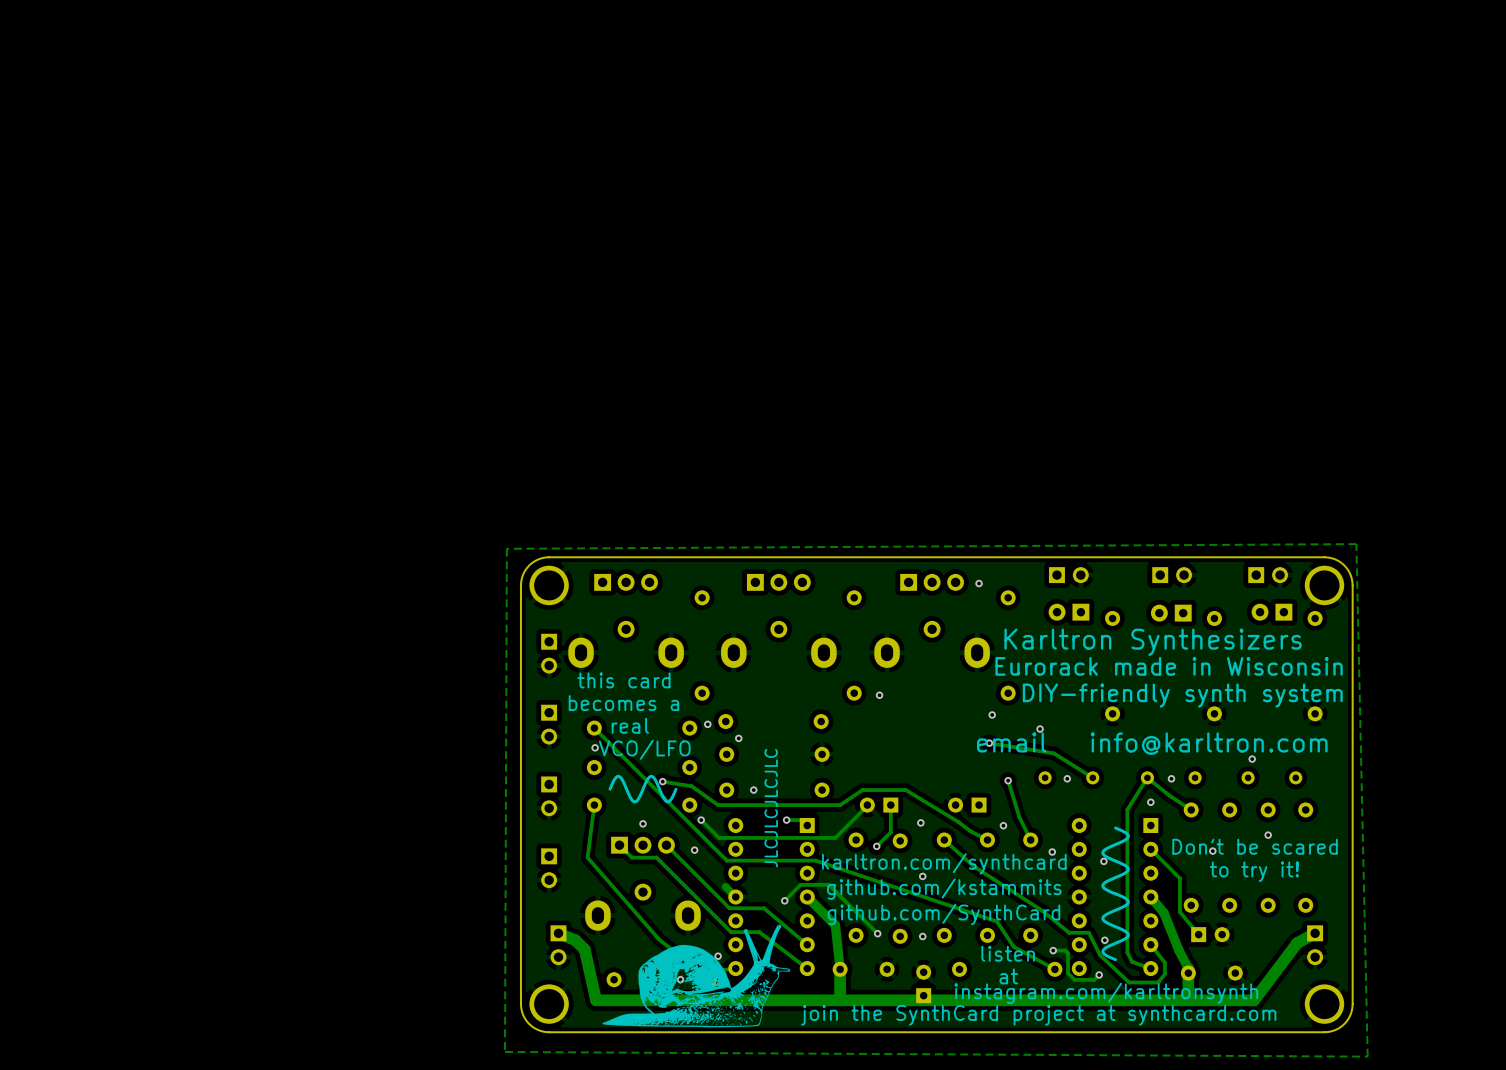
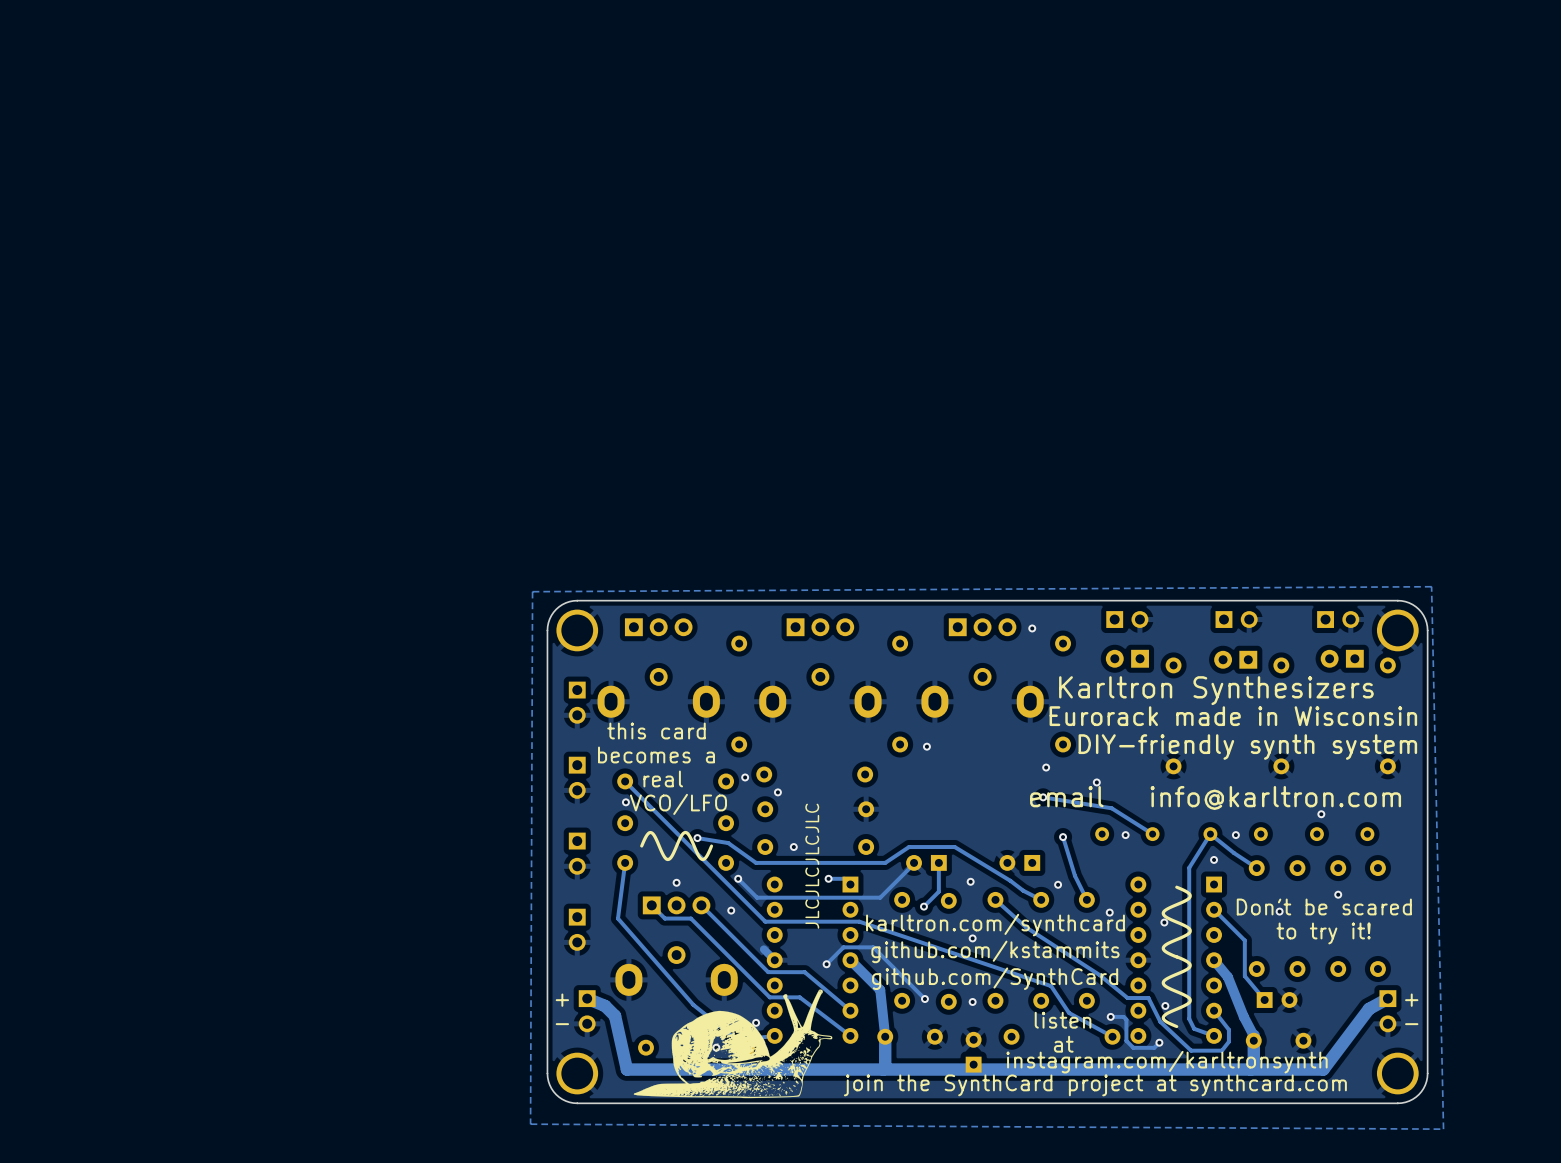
text: none -> + (562, 1000)
text: none -> + (1411, 1000)
text: none -> - (562, 1024)
text: none -> - (1411, 1024)

